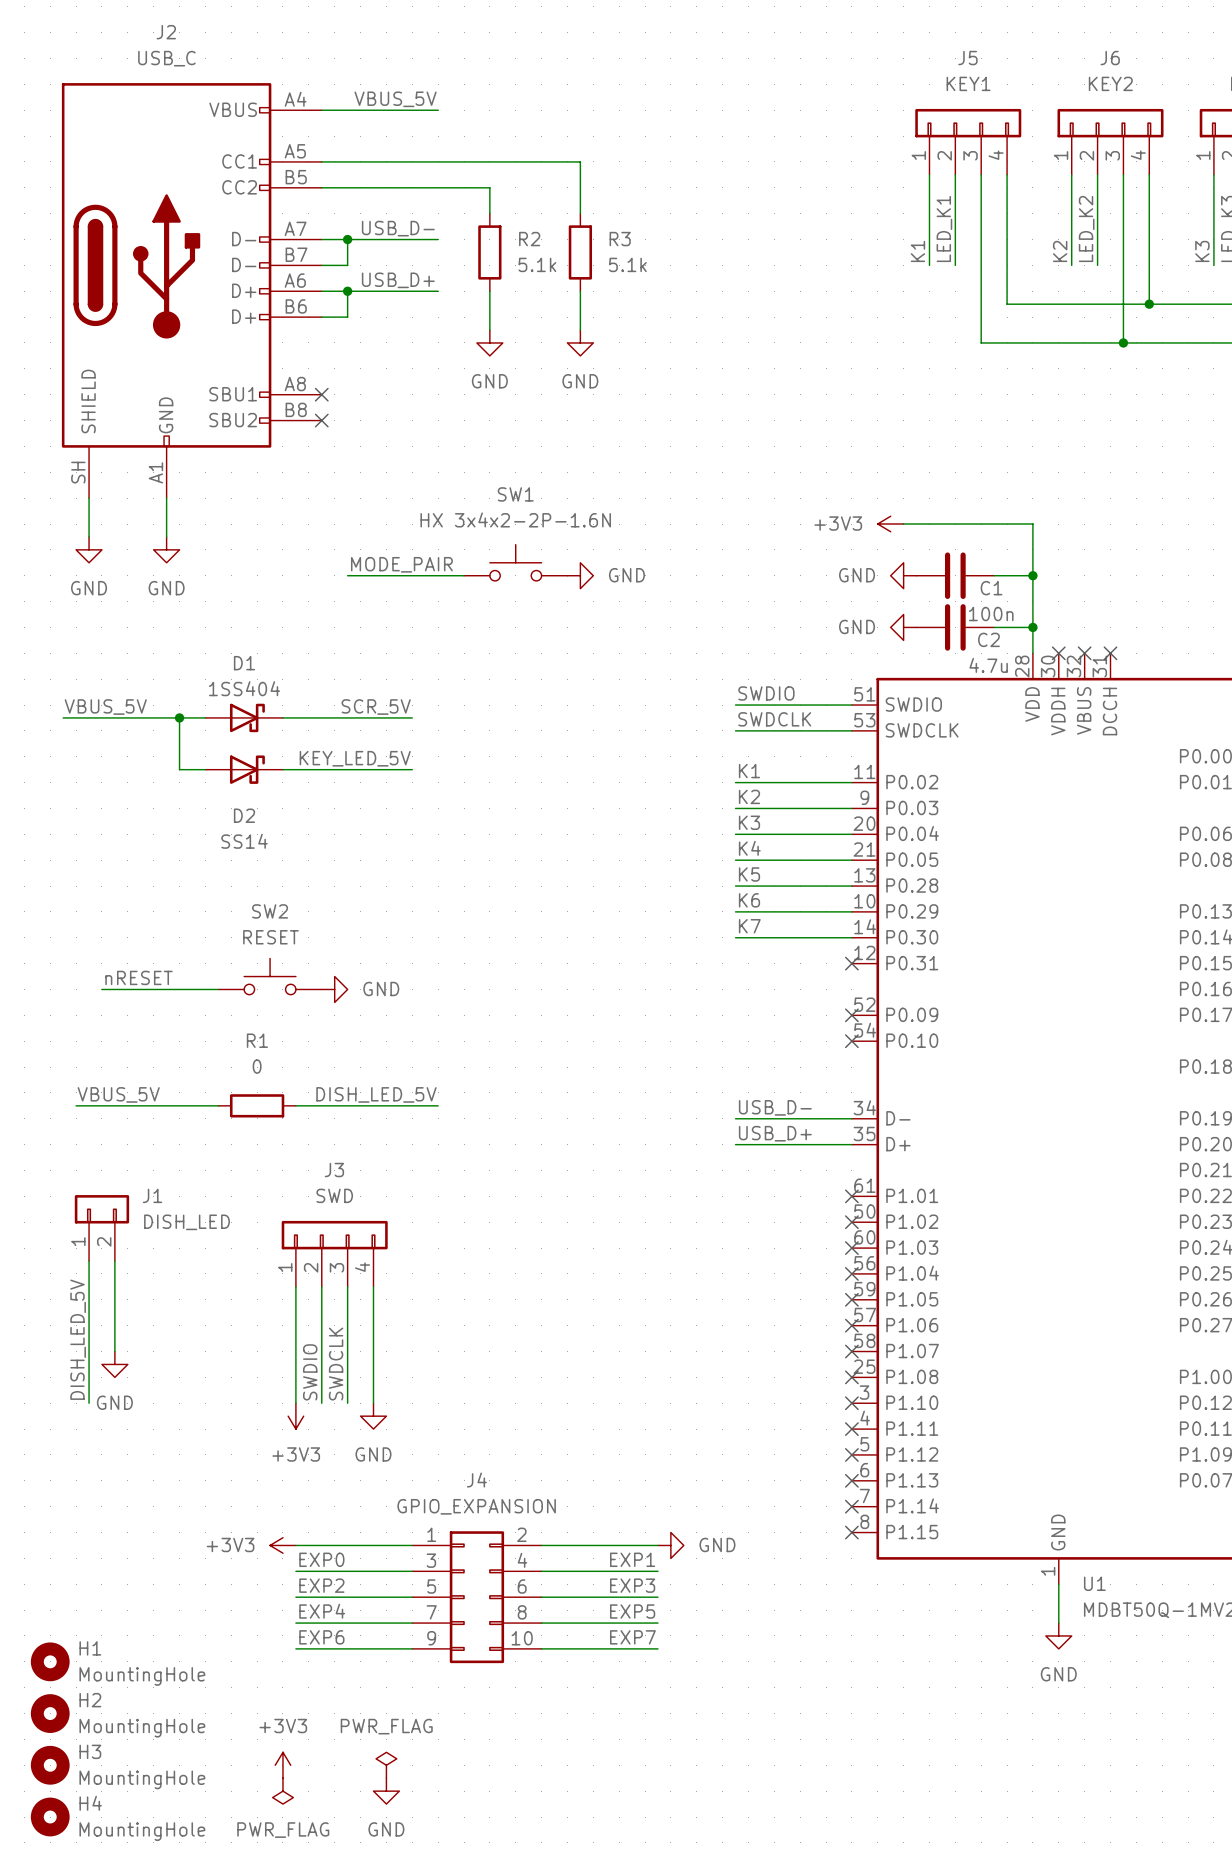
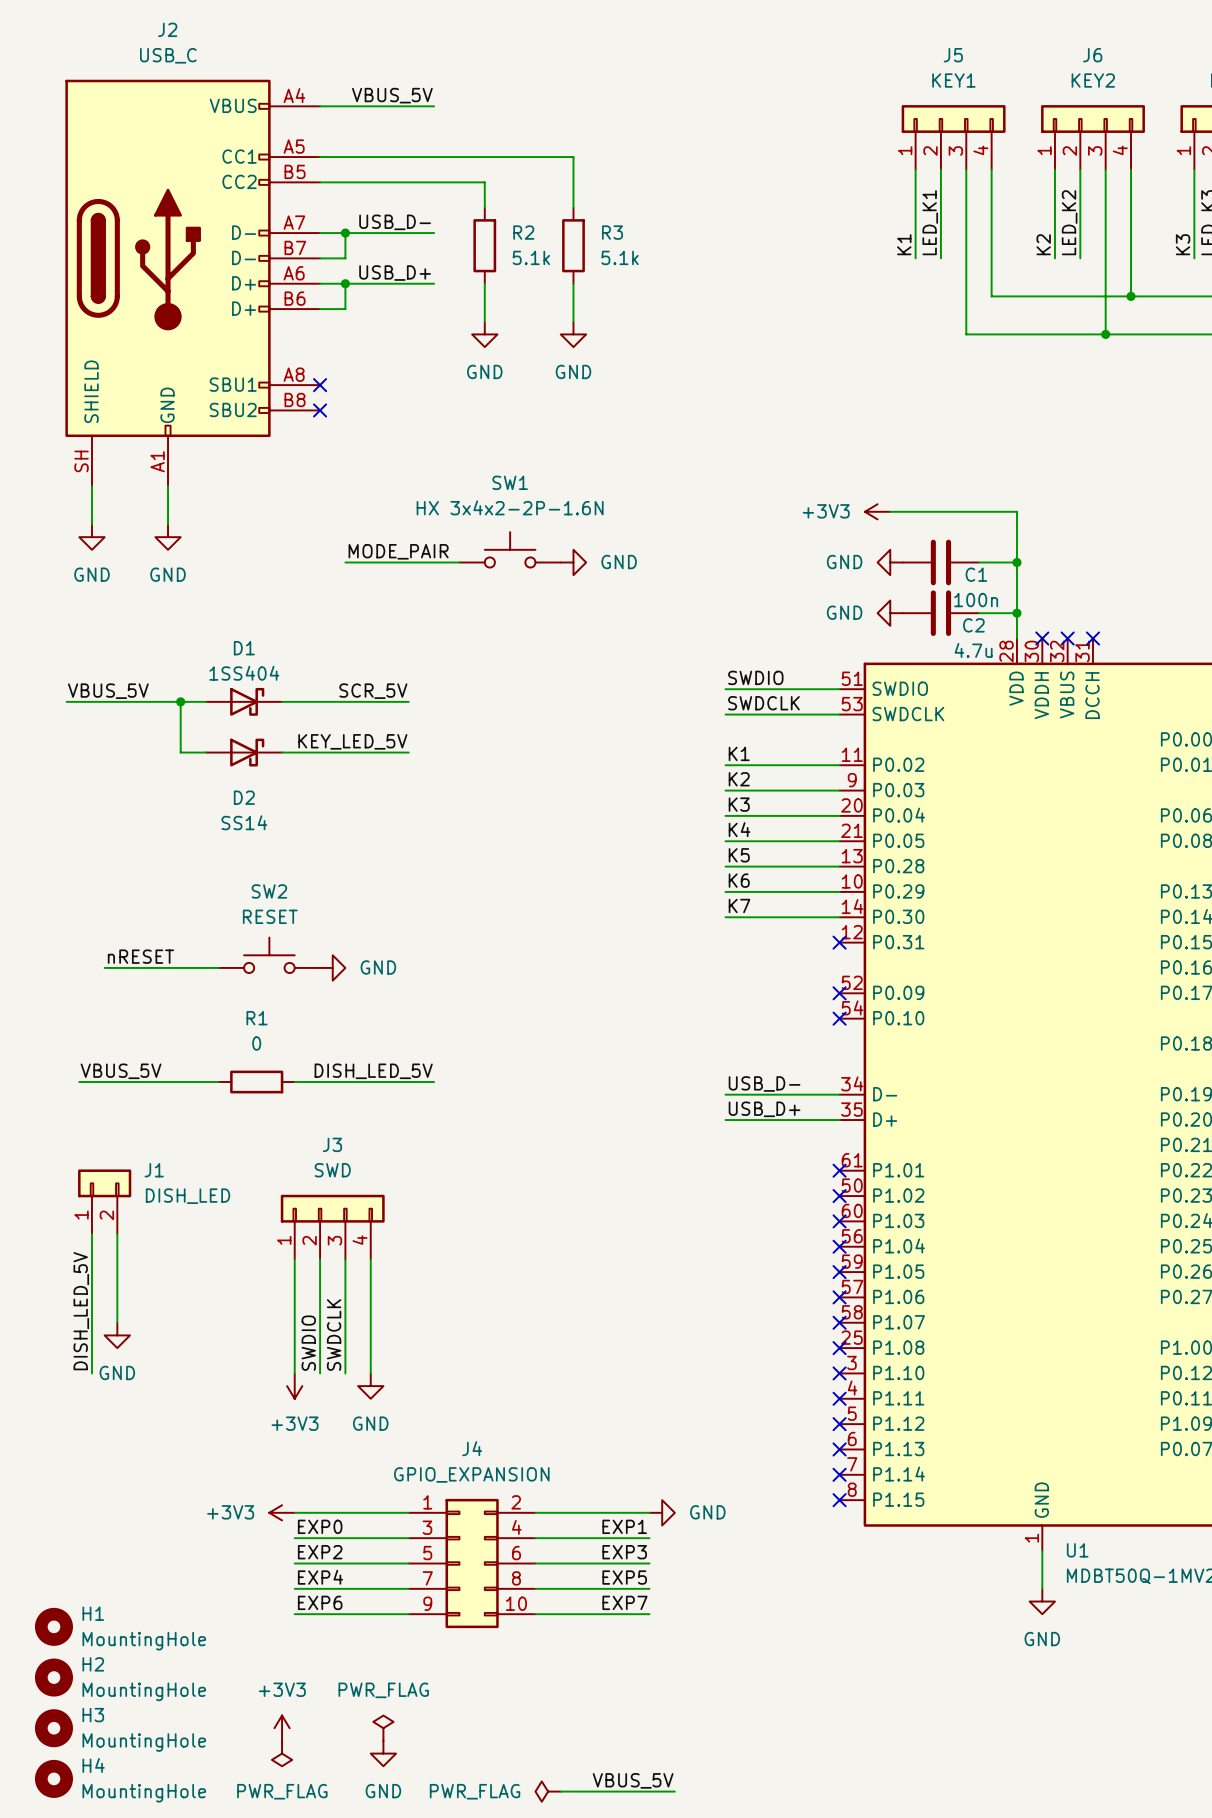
label: none -> VBUS_5V (633, 1780)
power symbol: none -> PWR_FLAG (548, 1791)
wire: none -> (560, 1791) (674, 1791)

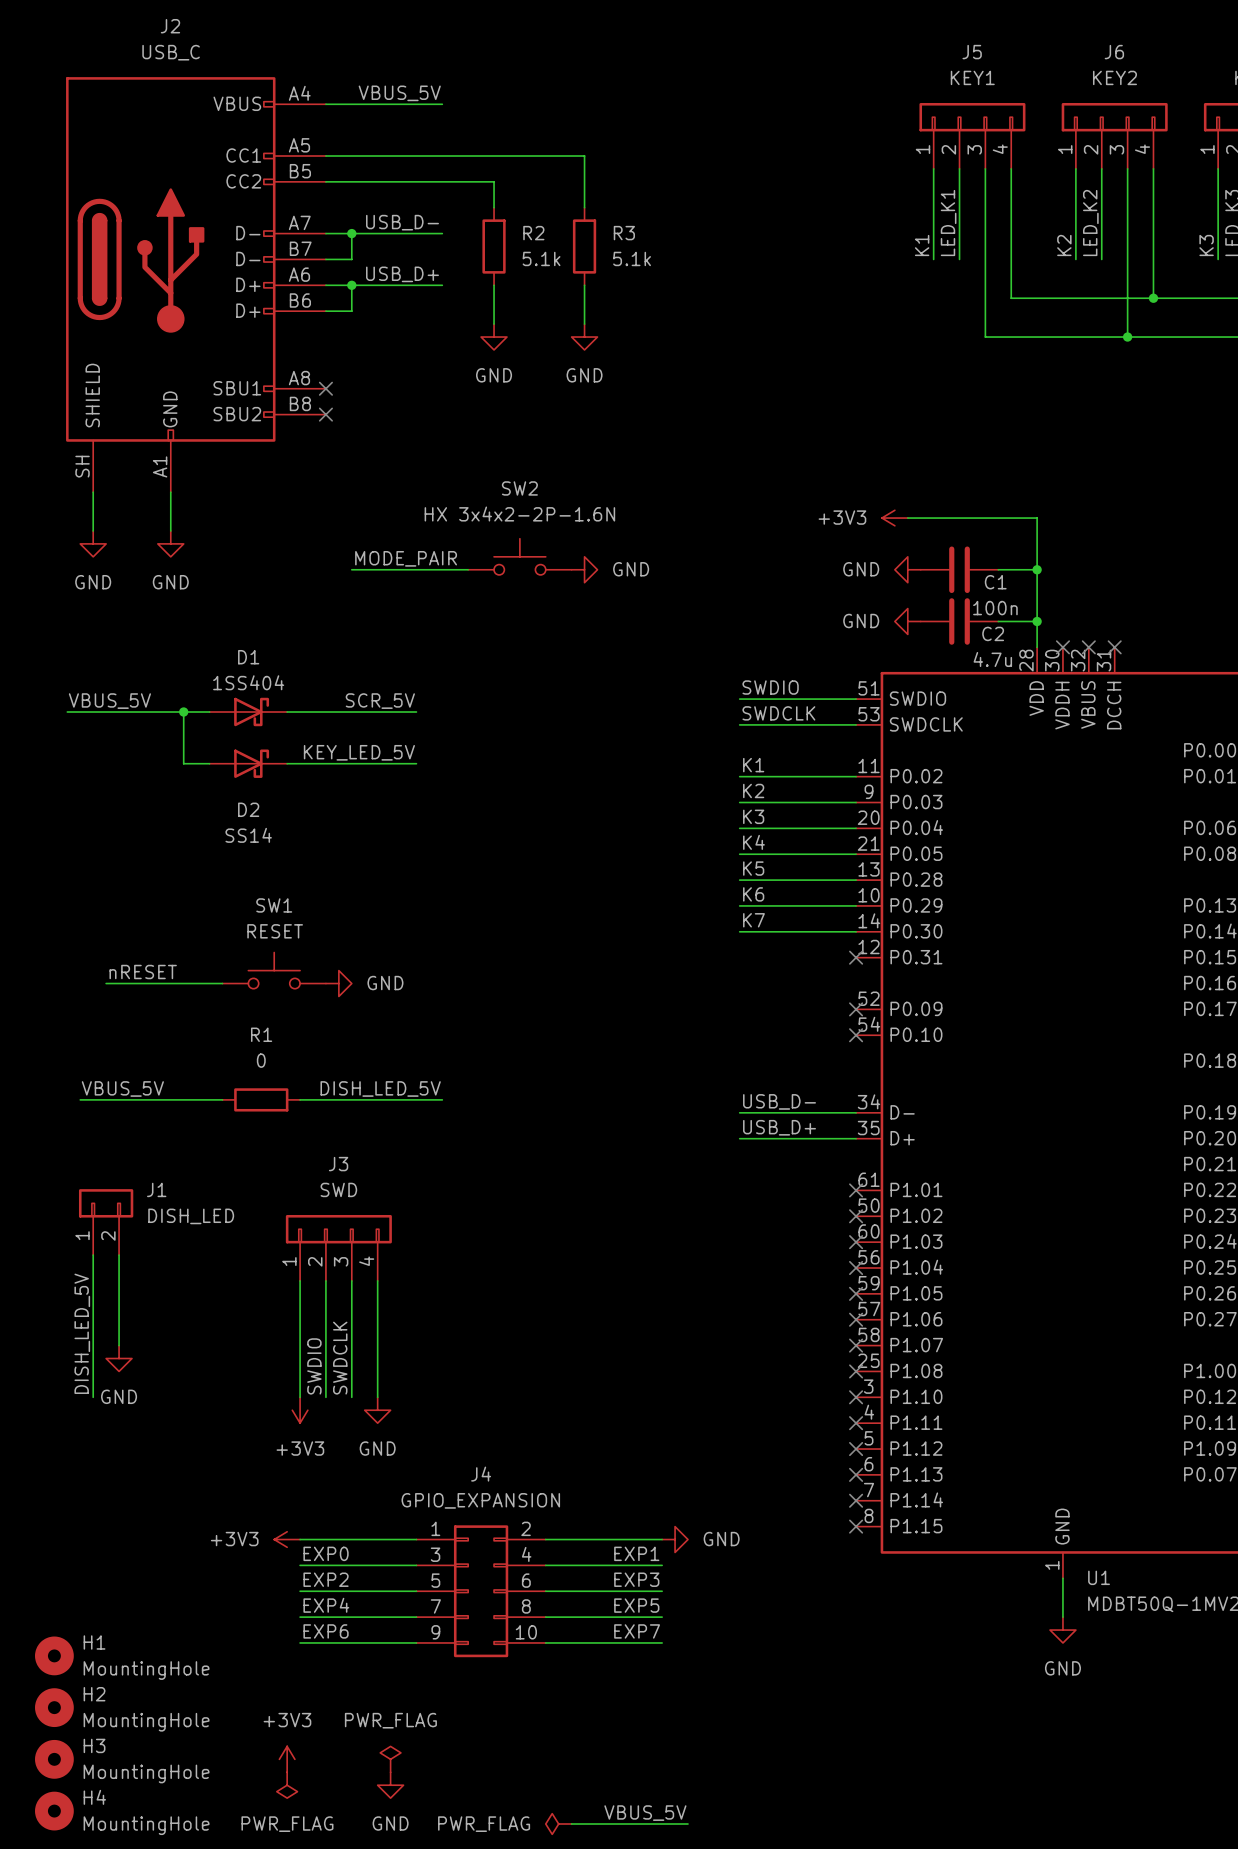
SW1 name: SW1 (510, 482) -> SW2 (519, 488)
SW2 name: SW2 (269, 891) -> SW1 (274, 905)

